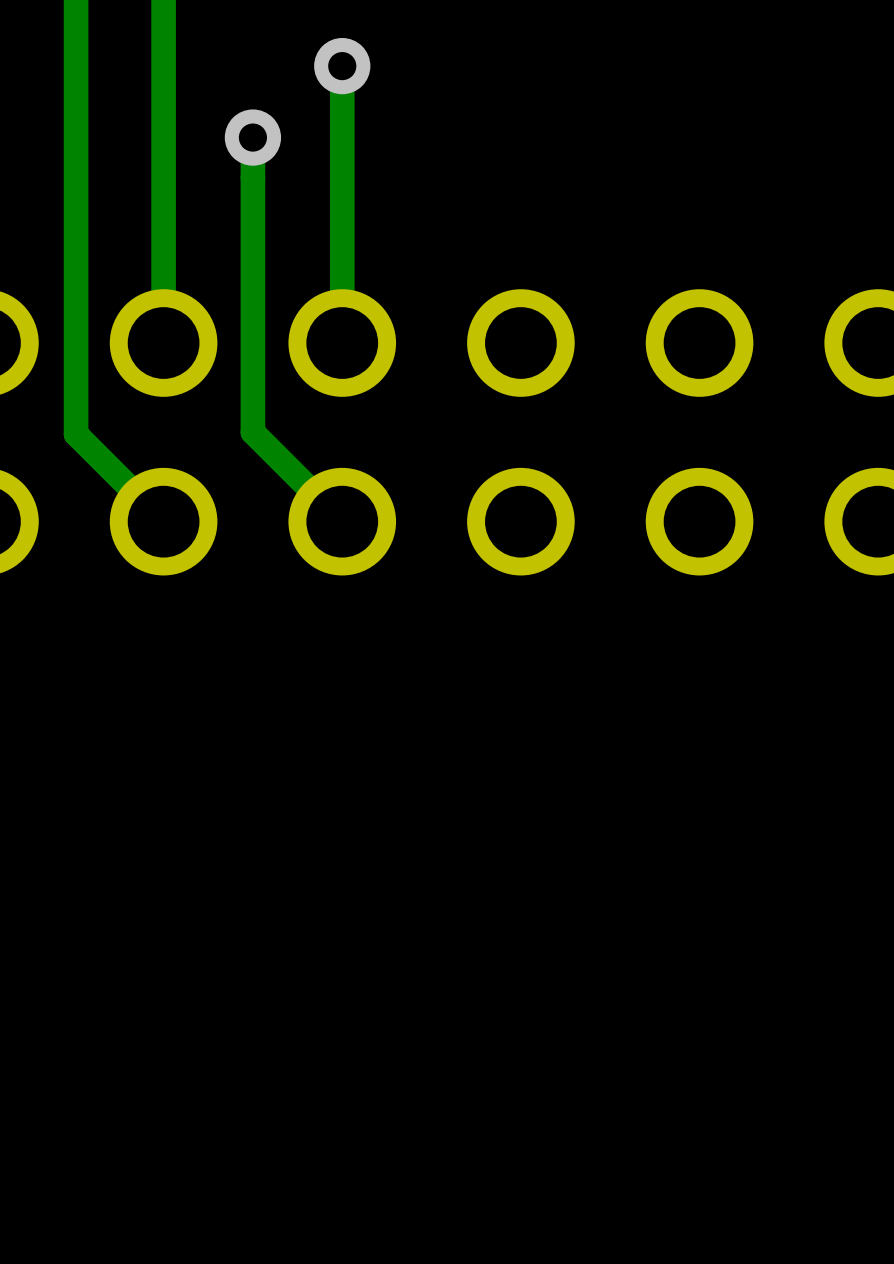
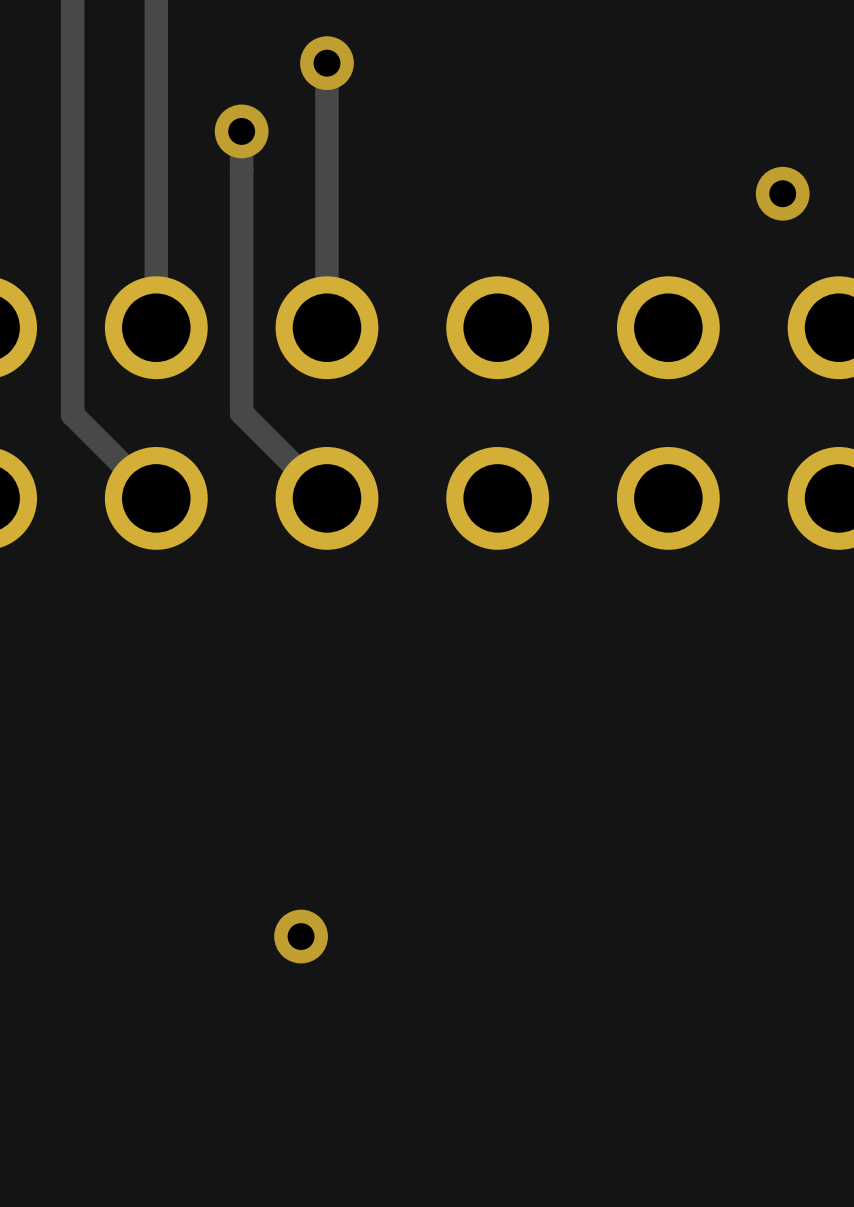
via: none -> (782, 193)
via: none -> (301, 936)

